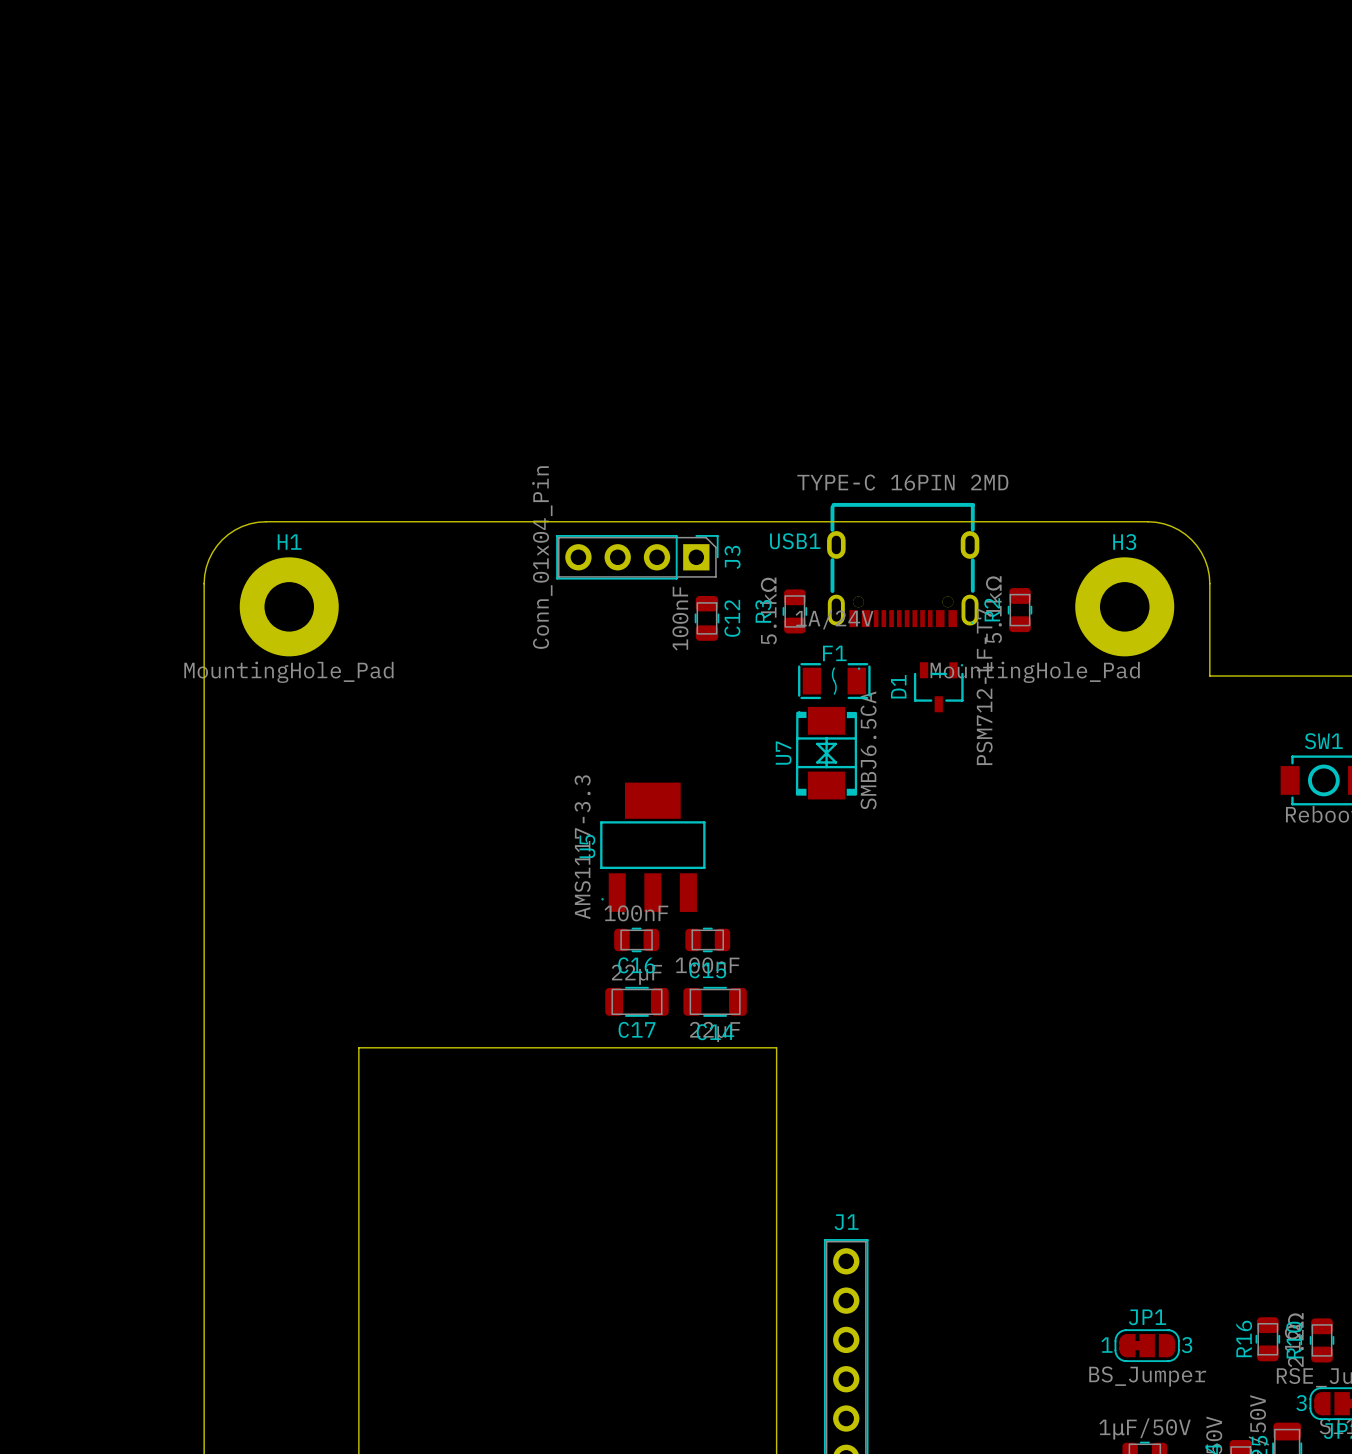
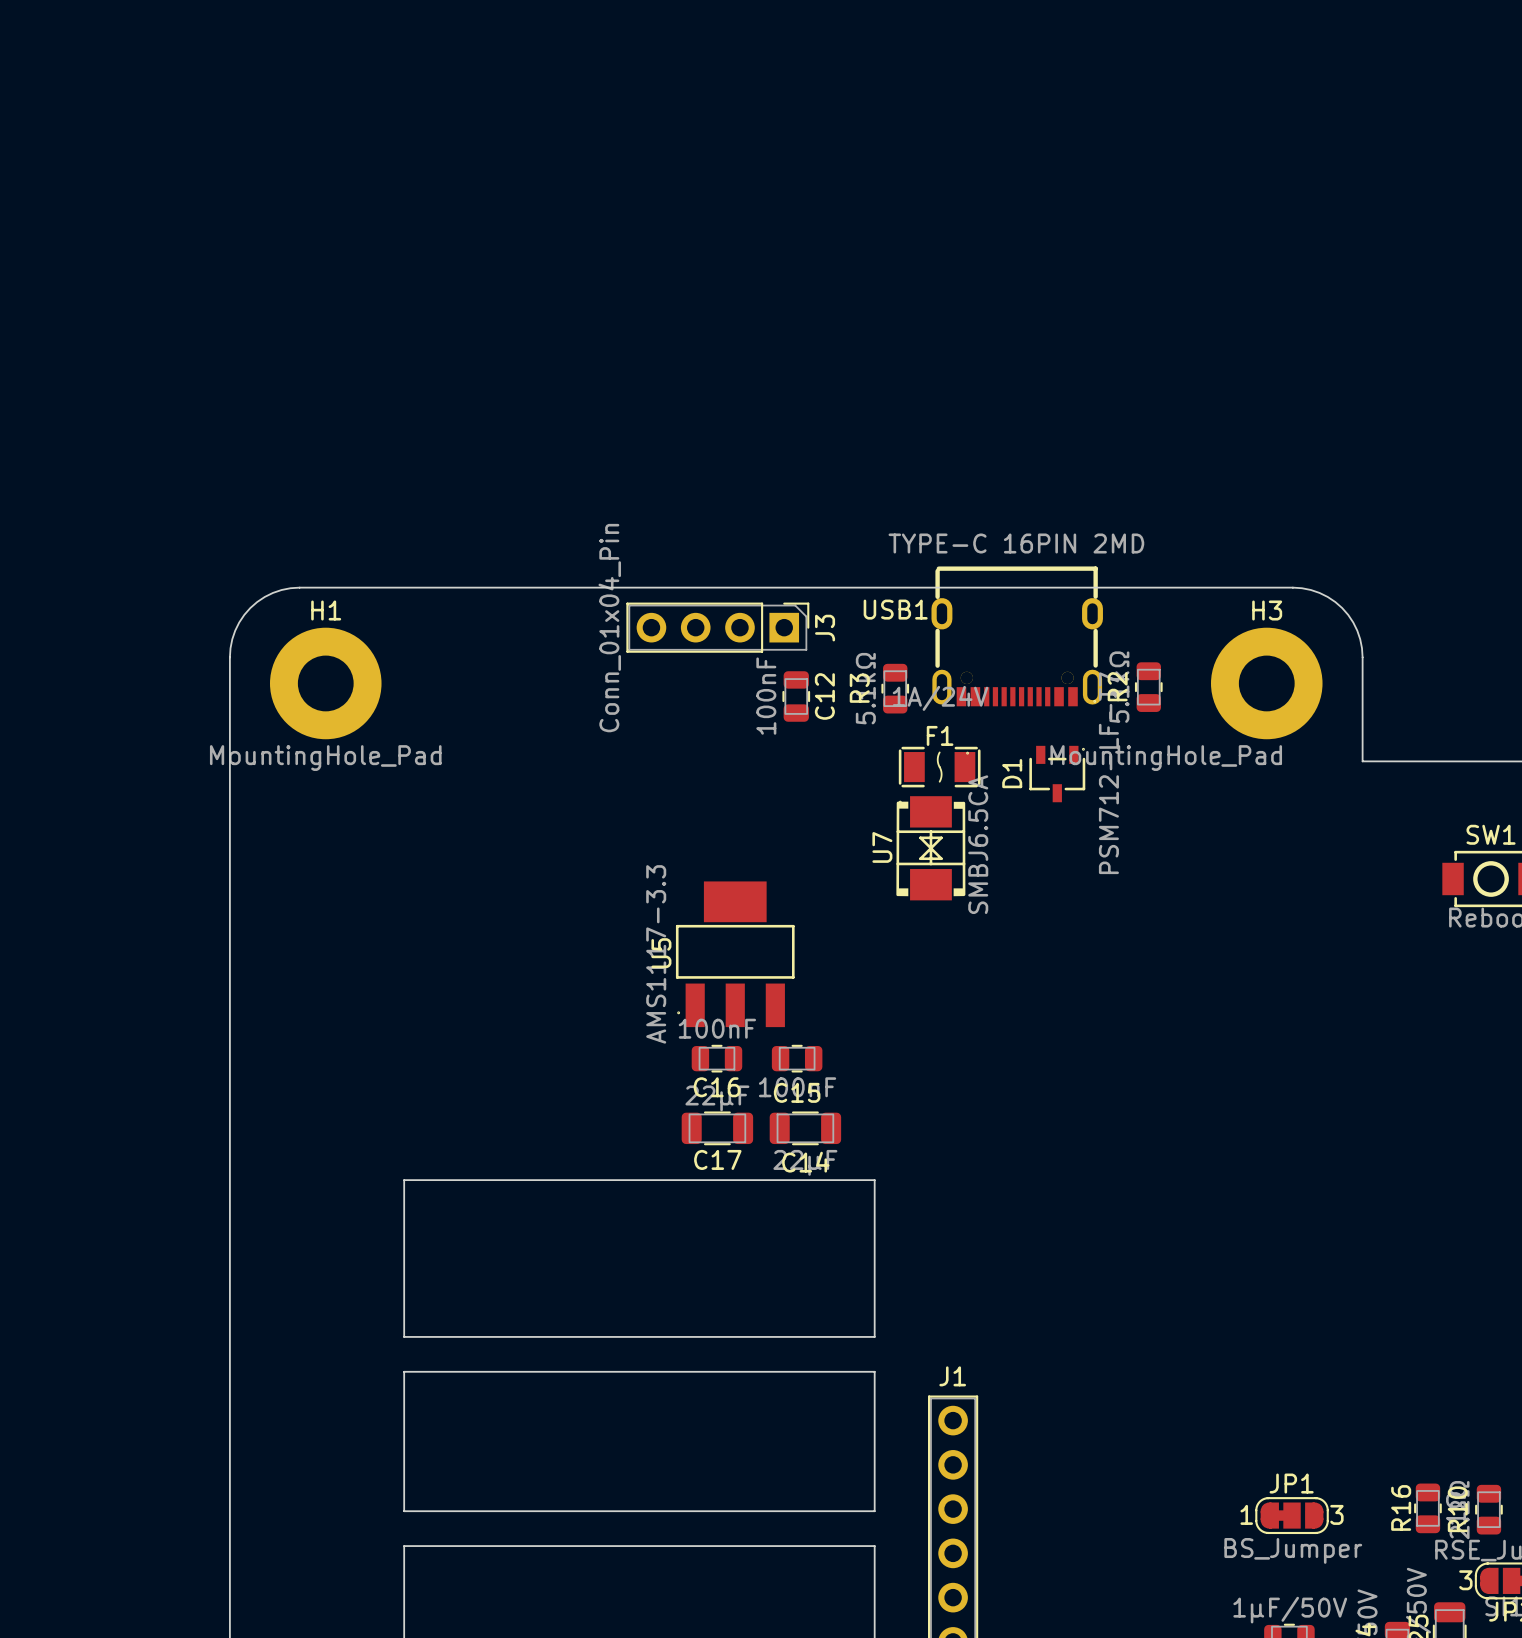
board edge: (358, 1187) (358, 1218) -> (404, 1336) (874, 1336)
board edge: (776, 1187) (776, 1218) -> (404, 1371) (874, 1371)
board edge: (358, 1341) (358, 1372) -> (404, 1511) (874, 1511)
board edge: (776, 1341) (776, 1372) -> (404, 1546) (874, 1546)

